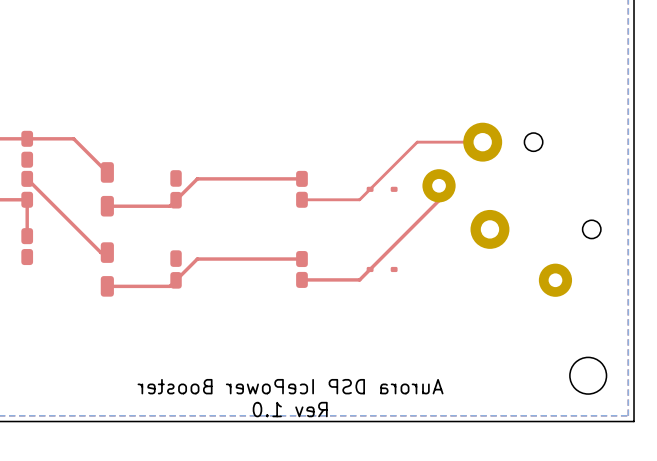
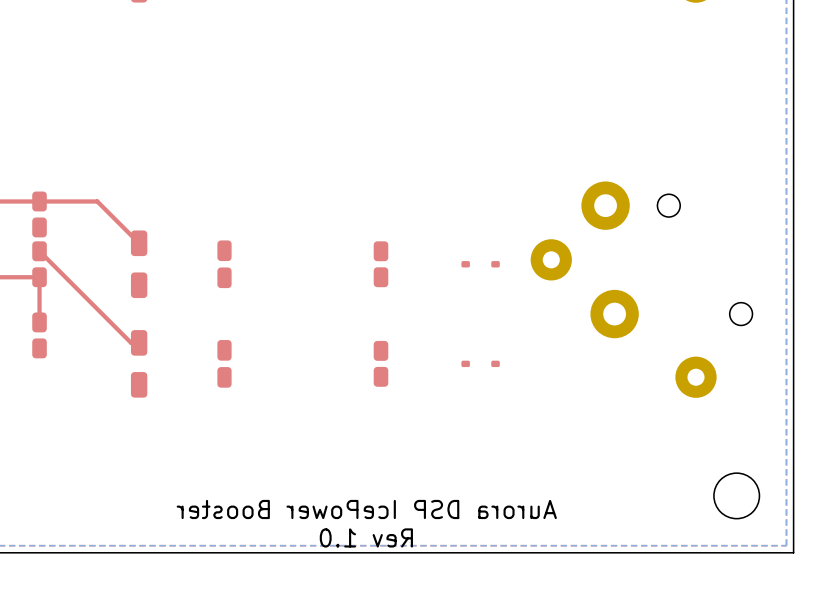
top track: (482, 142) (417, 142) (359, 199) (301, 199) -> none
top track: (301, 178) (197, 178) (170, 206) (107, 206) -> none
top track: (439, 185) (439, 200) (359, 279) (301, 279) -> none
top track: (301, 259) (197, 259) (170, 286) (107, 286) -> none

